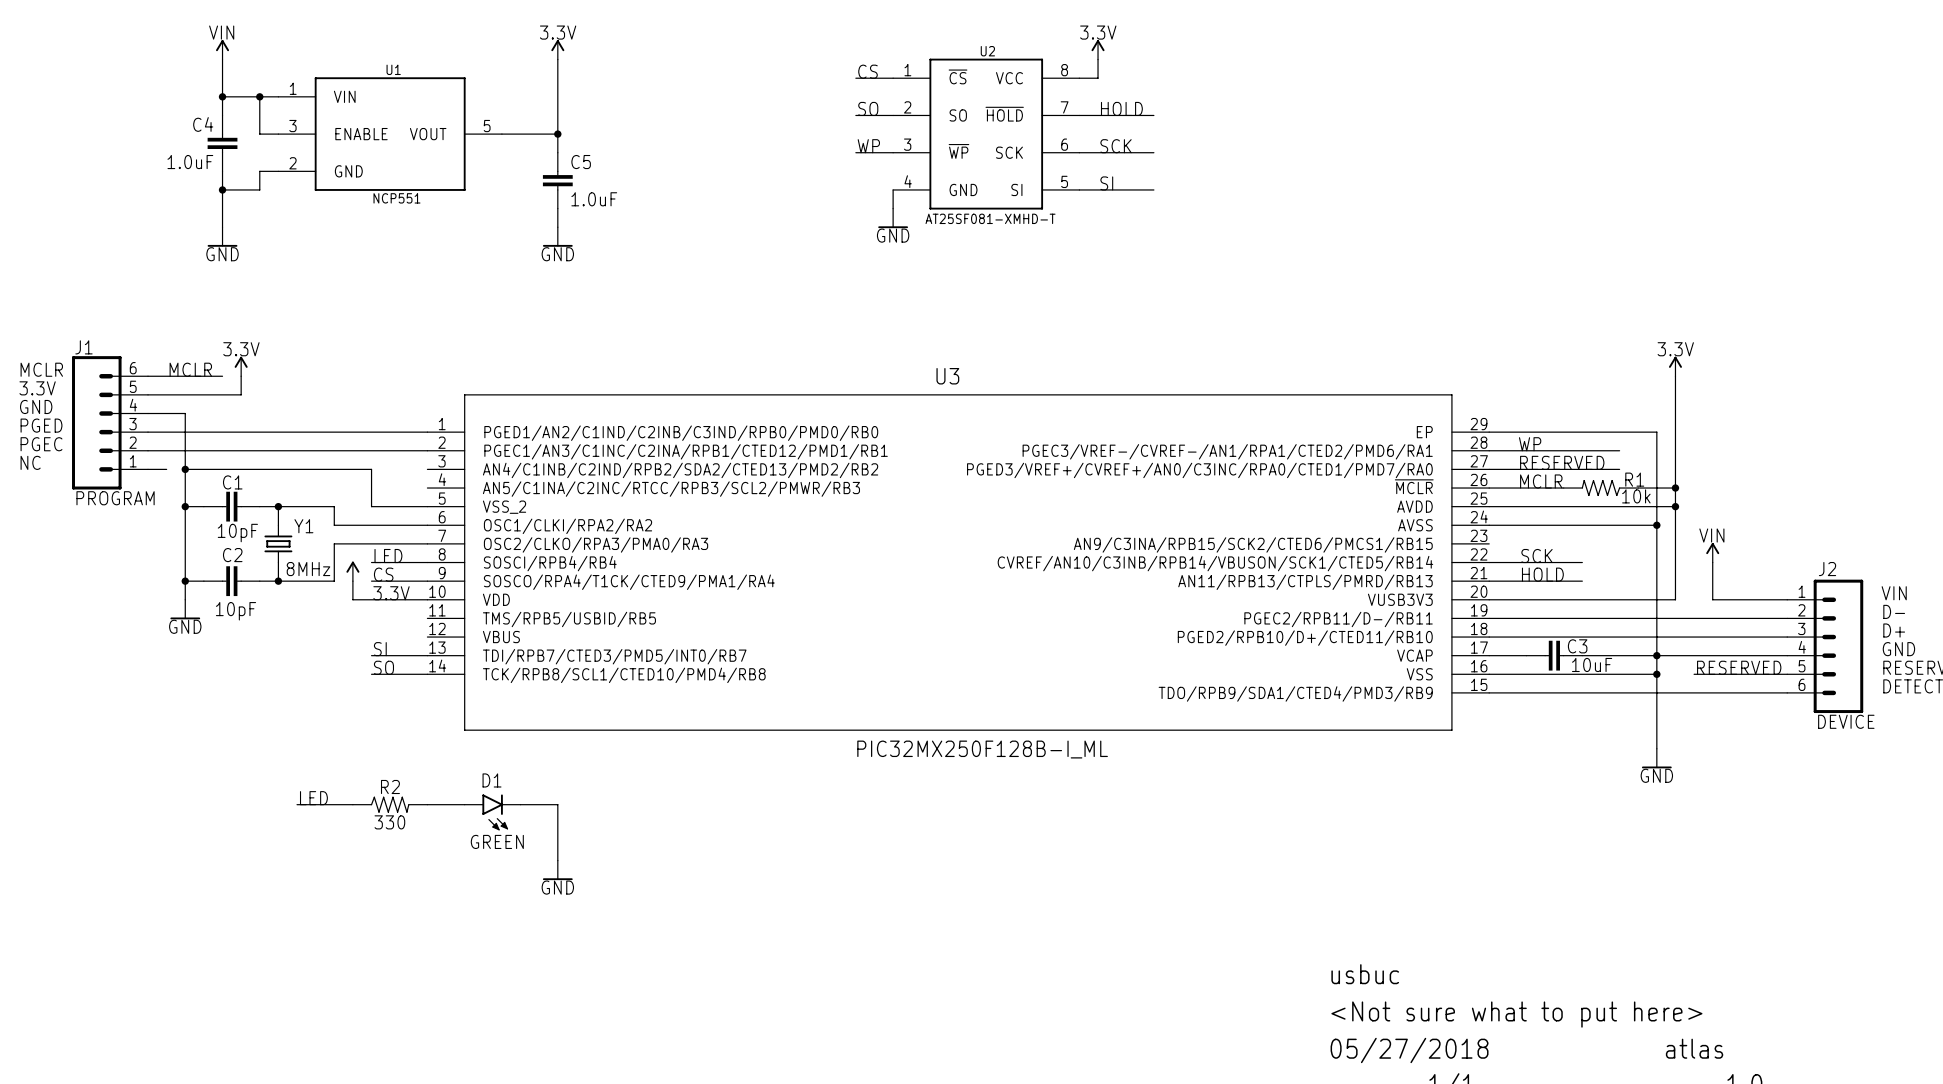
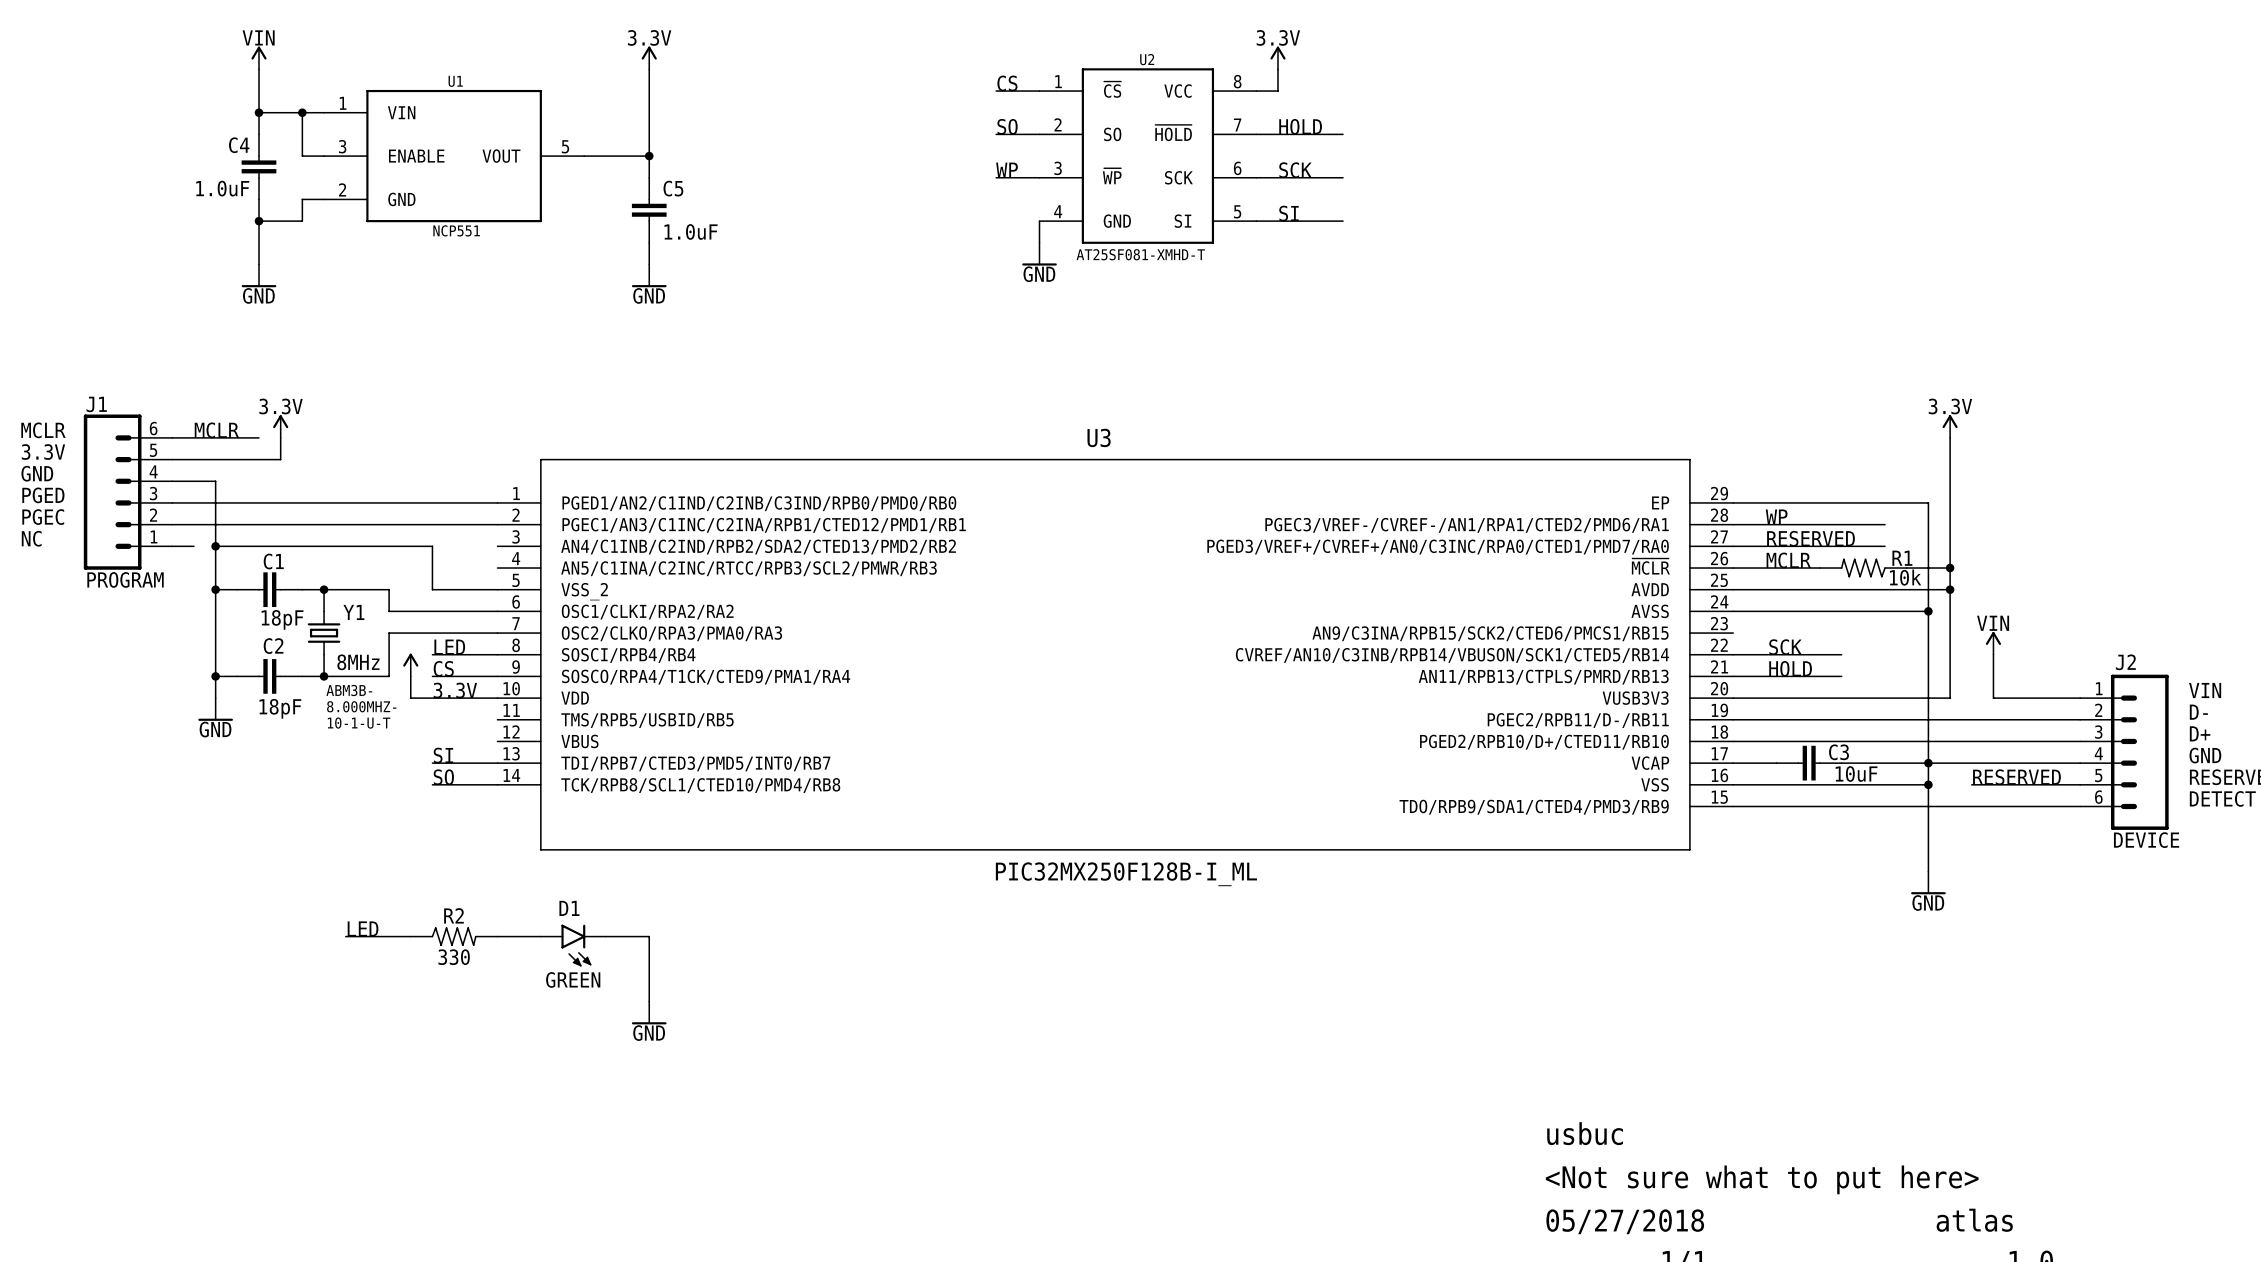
C1 value: 10pF (237, 533) -> 18pF (282, 619)
text: none -> ABM3B- (349, 690)
text: none -> 8.000MHZ- (361, 706)
C2 value: 10pF (235, 611) -> 18pF (280, 708)
text: none -> 10-1-U-T (359, 723)

